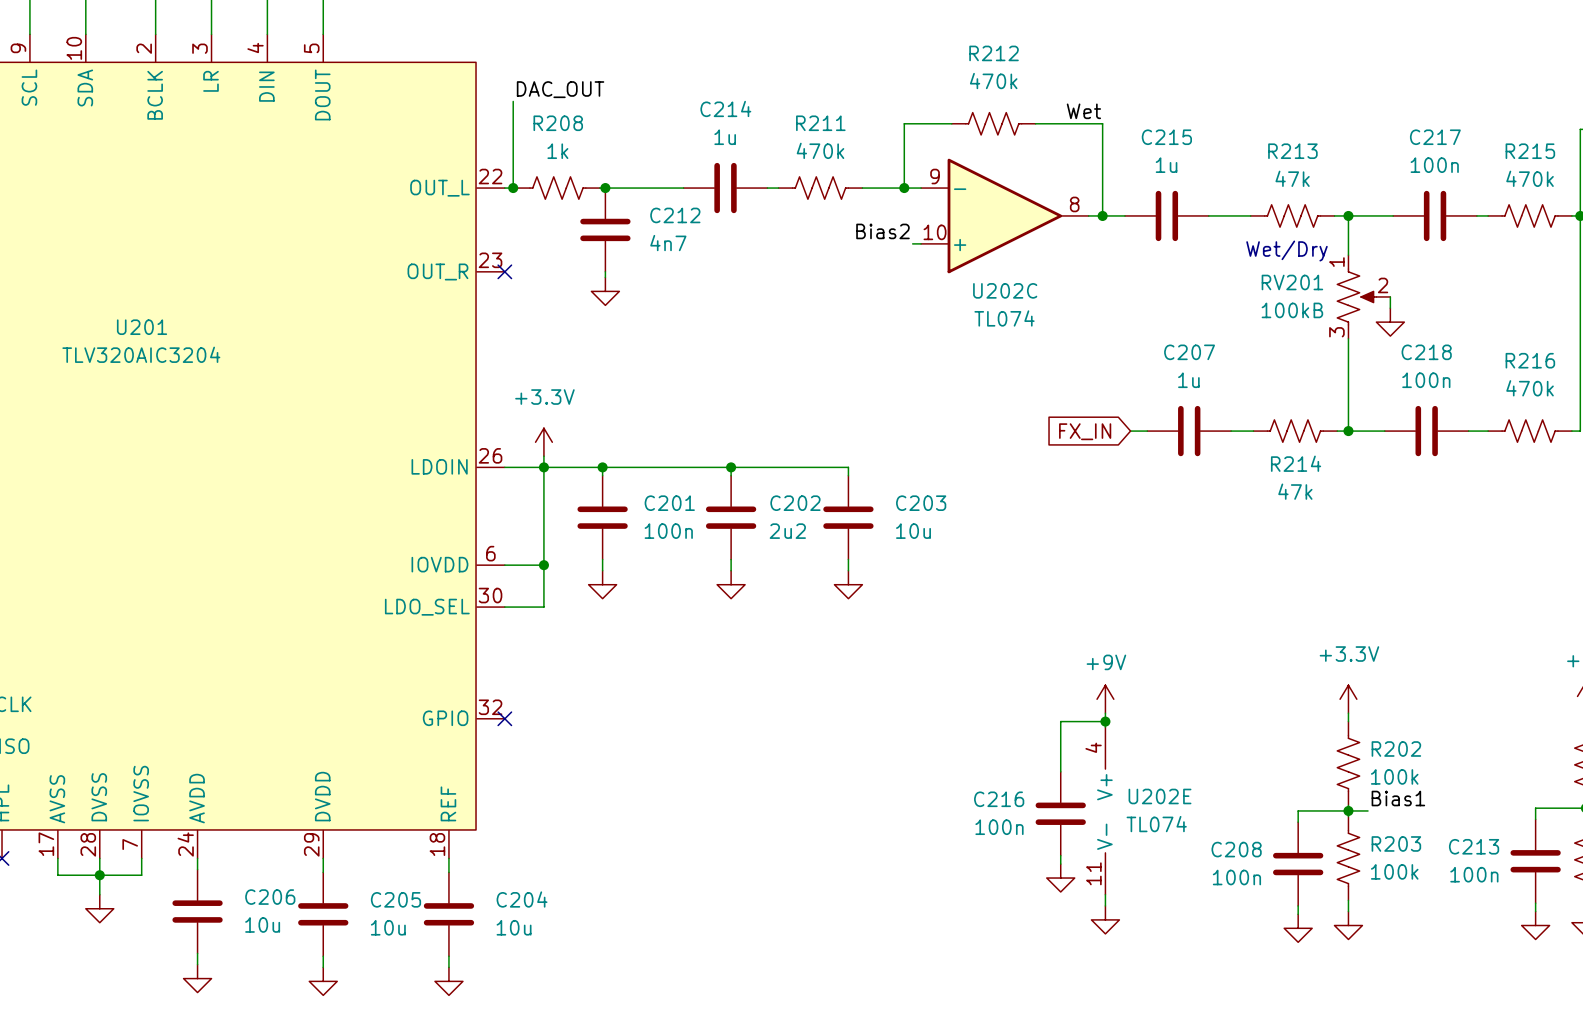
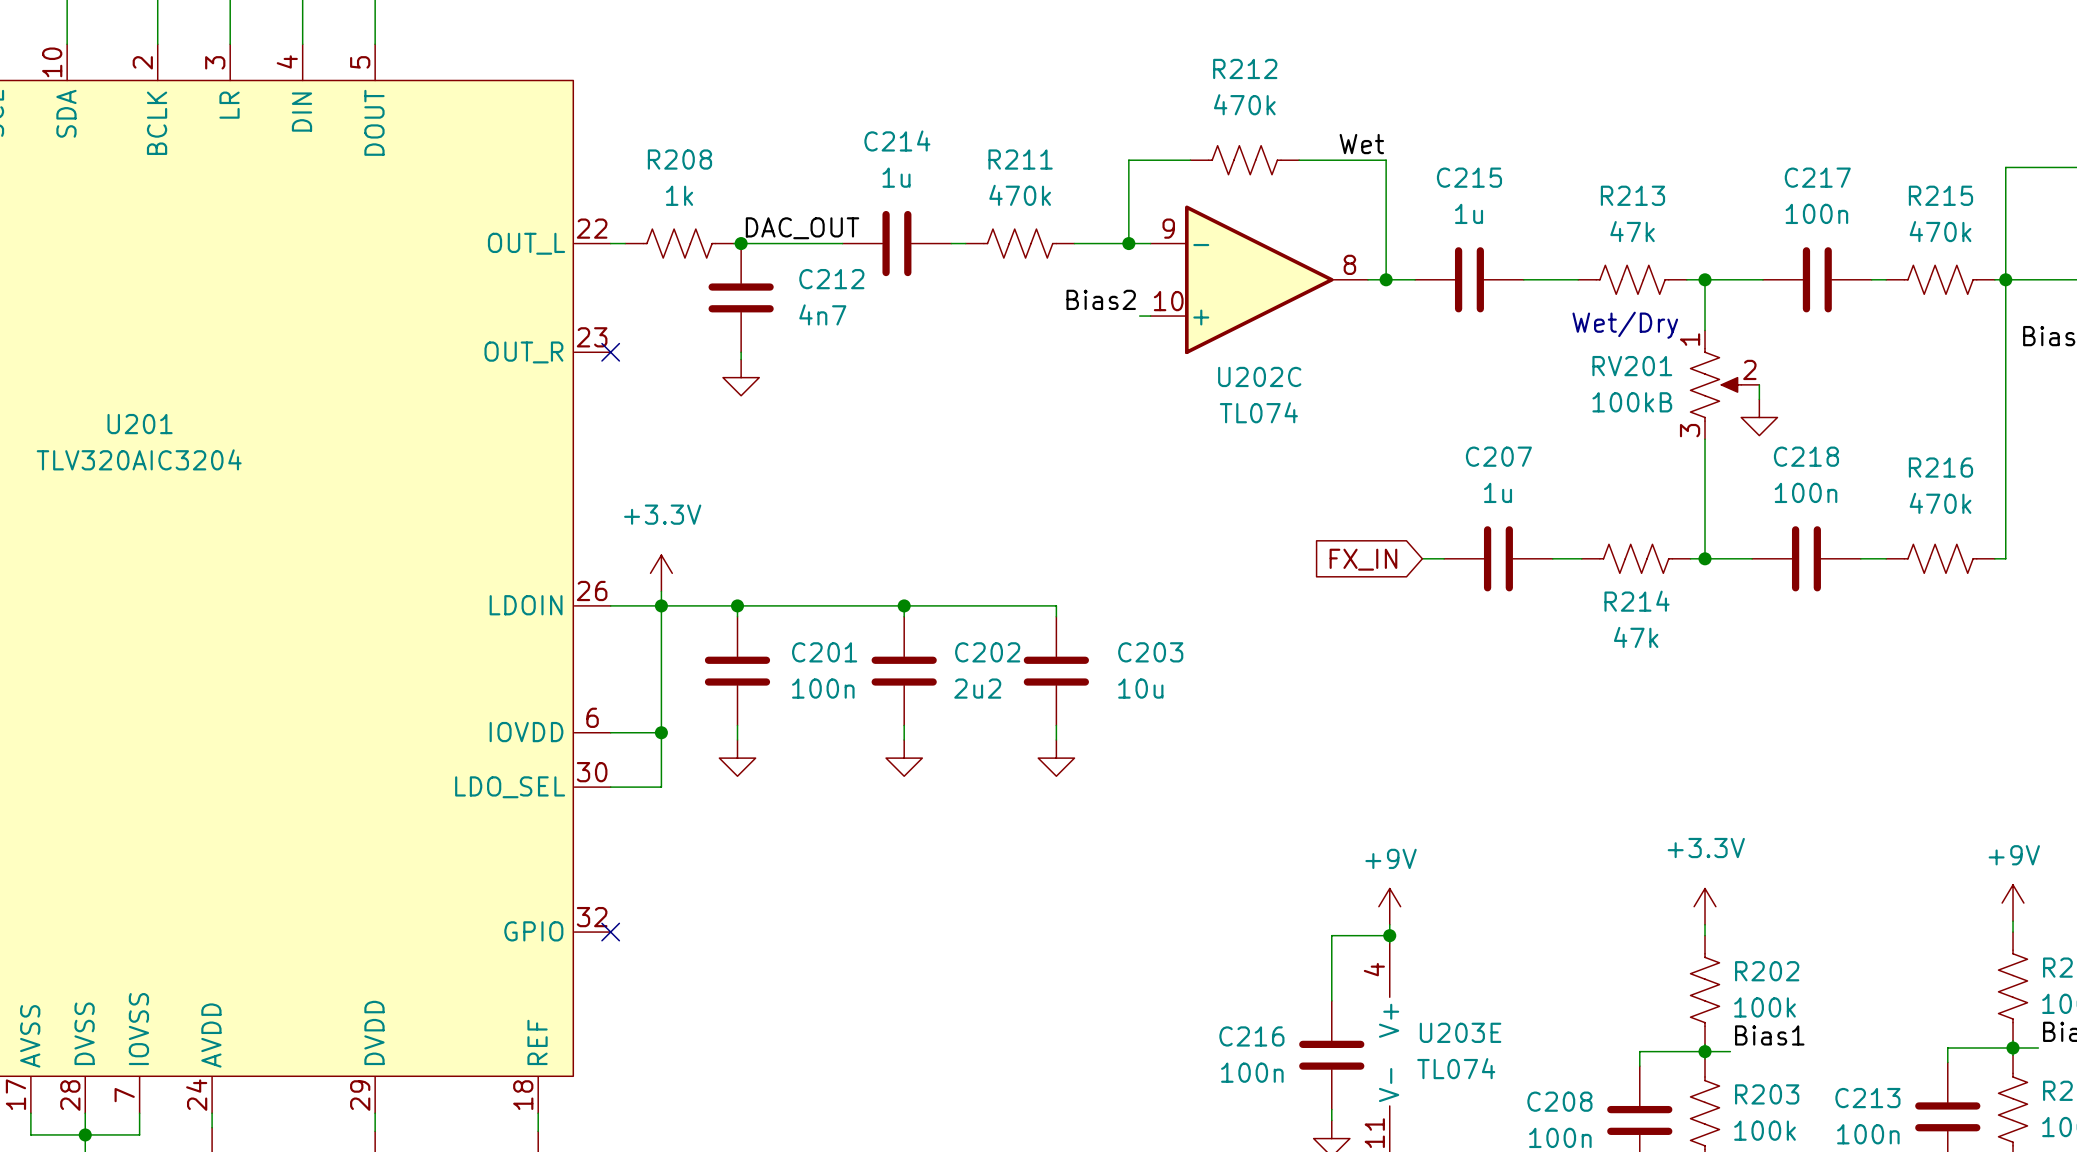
label position: DAC_OUT (560, 89) -> DAC_OUT (802, 228)
wire: (513, 101) (513, 188) -> none
junction: (513, 188) -> none
U202E name: U202E (1160, 796) -> U203E (1460, 1032)

